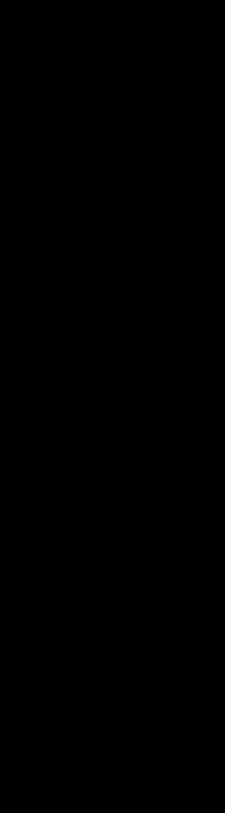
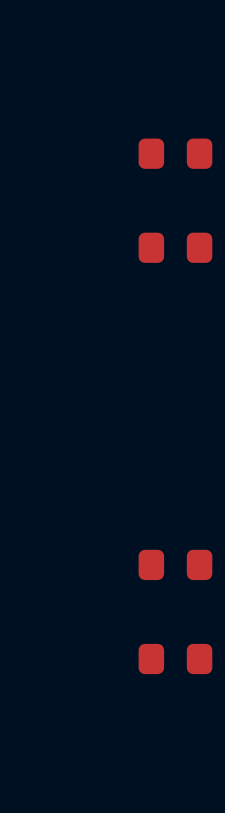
part: none -> (175, 153)
part: none -> (175, 247)
part: none -> (175, 564)
part: none -> (175, 658)

